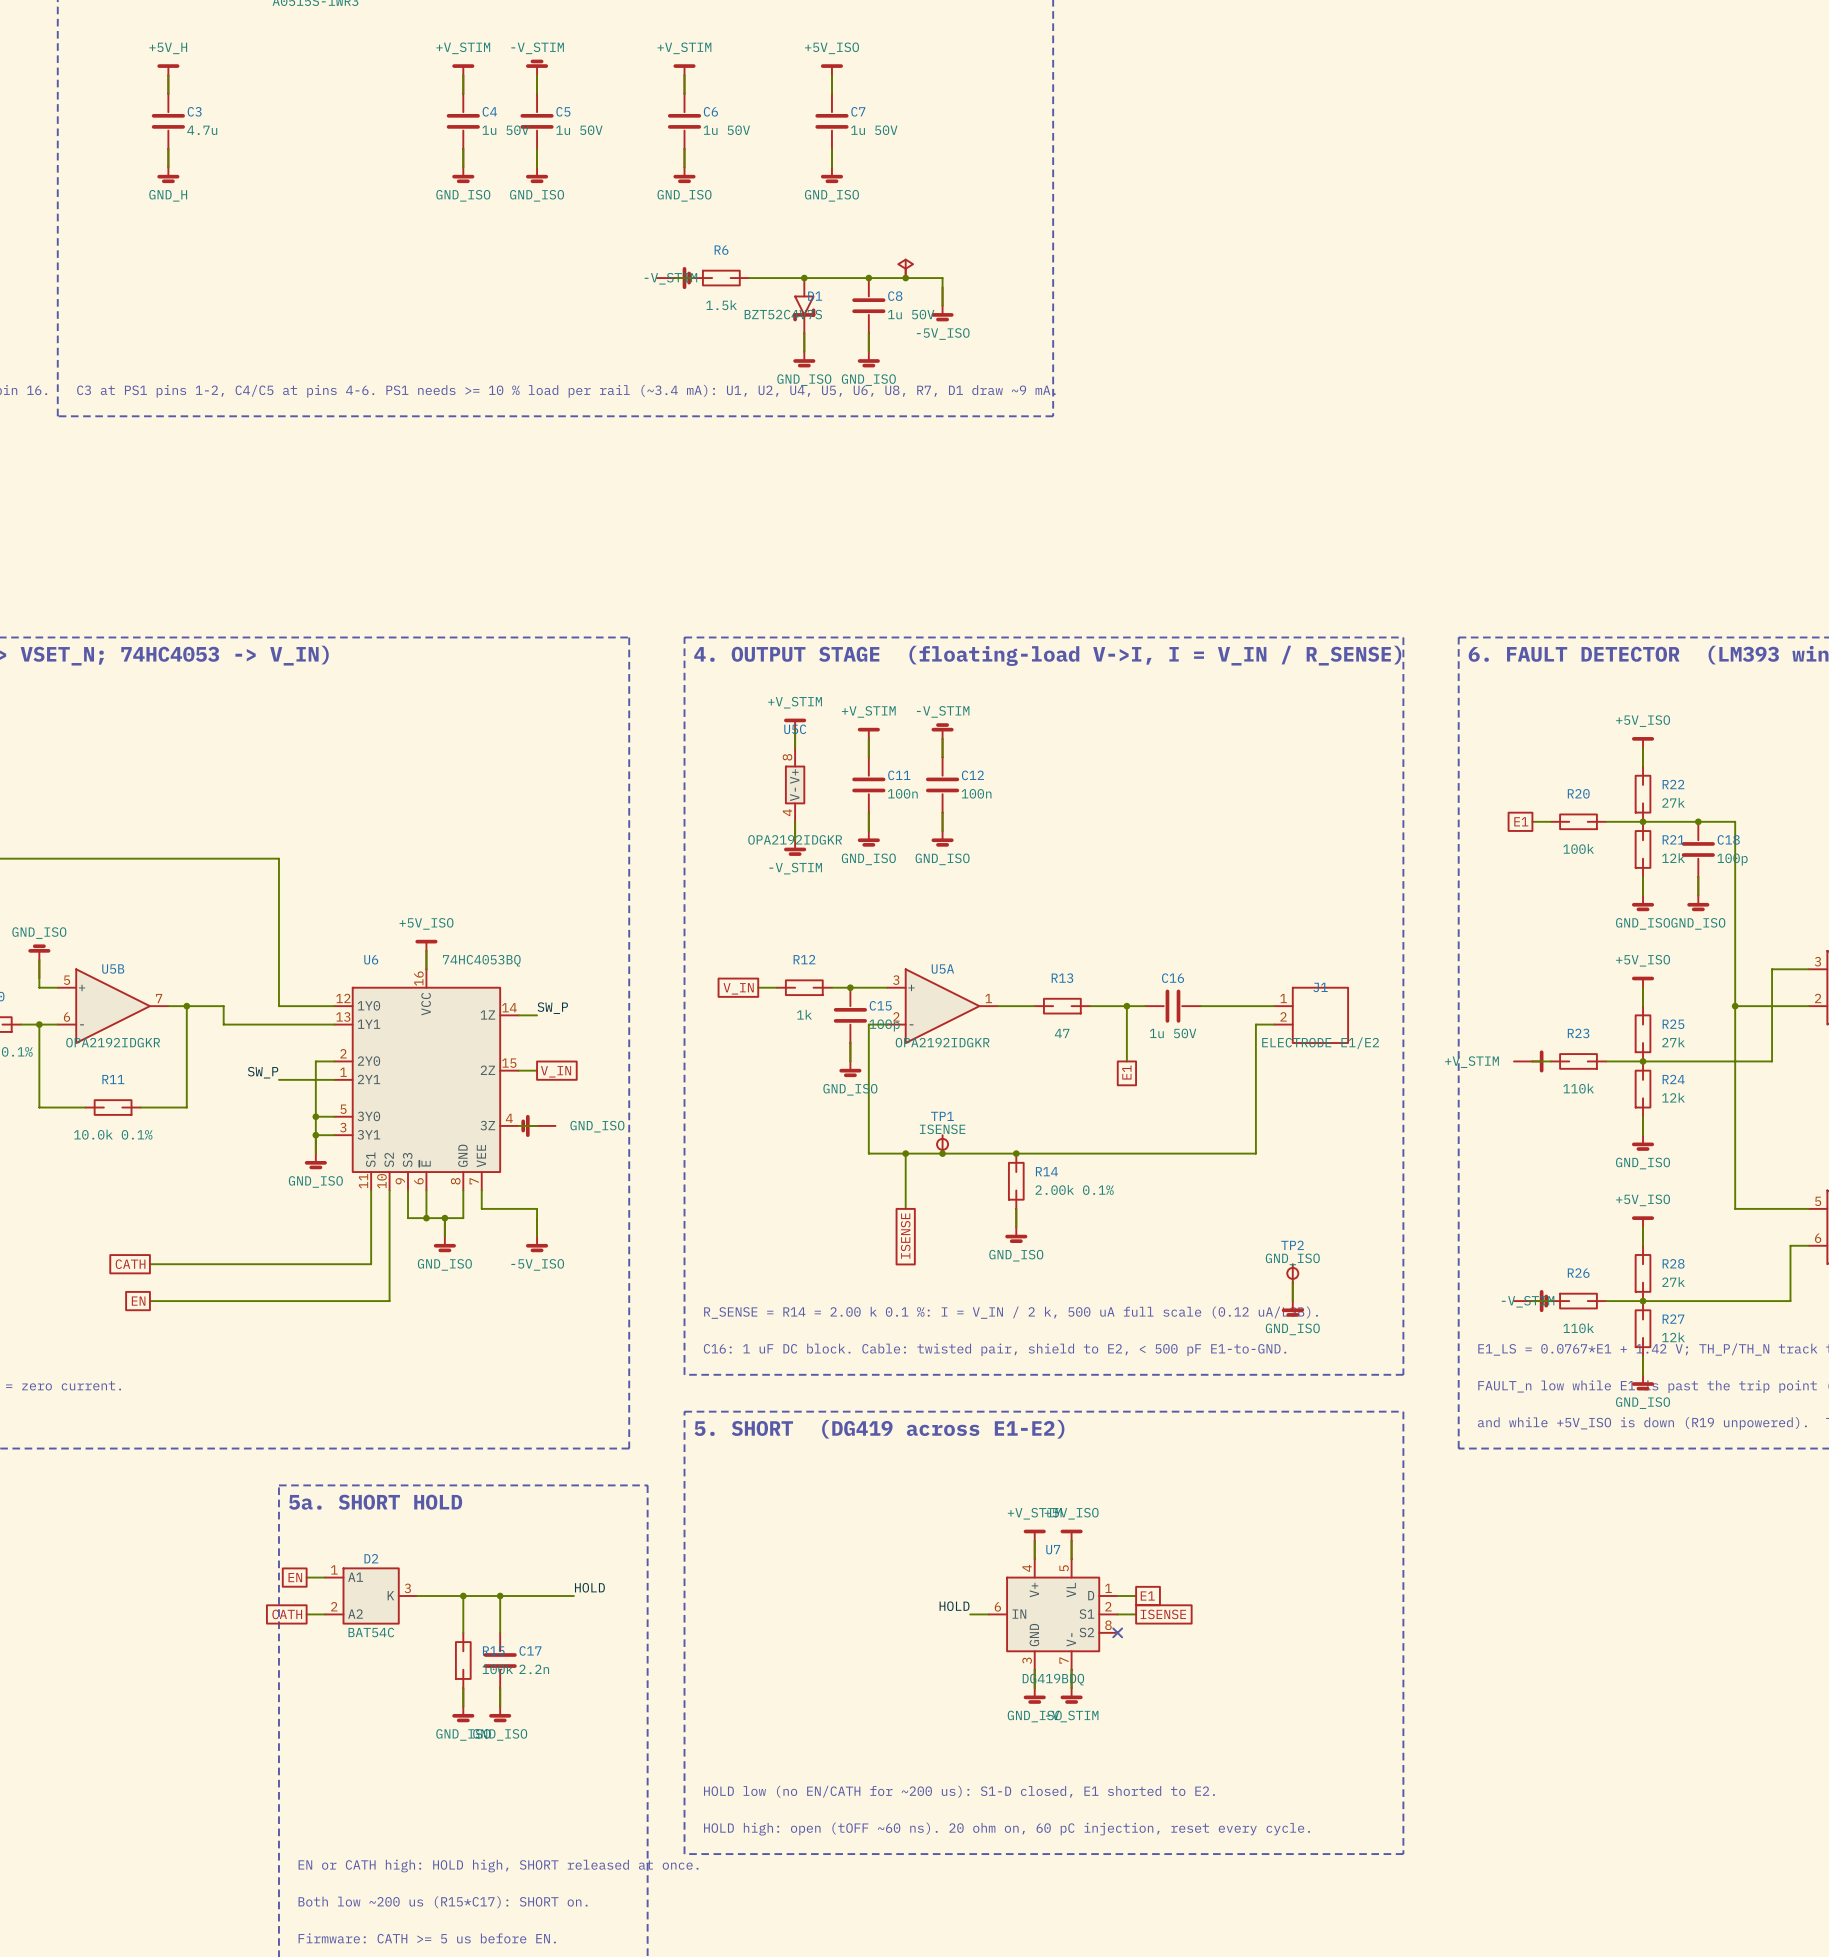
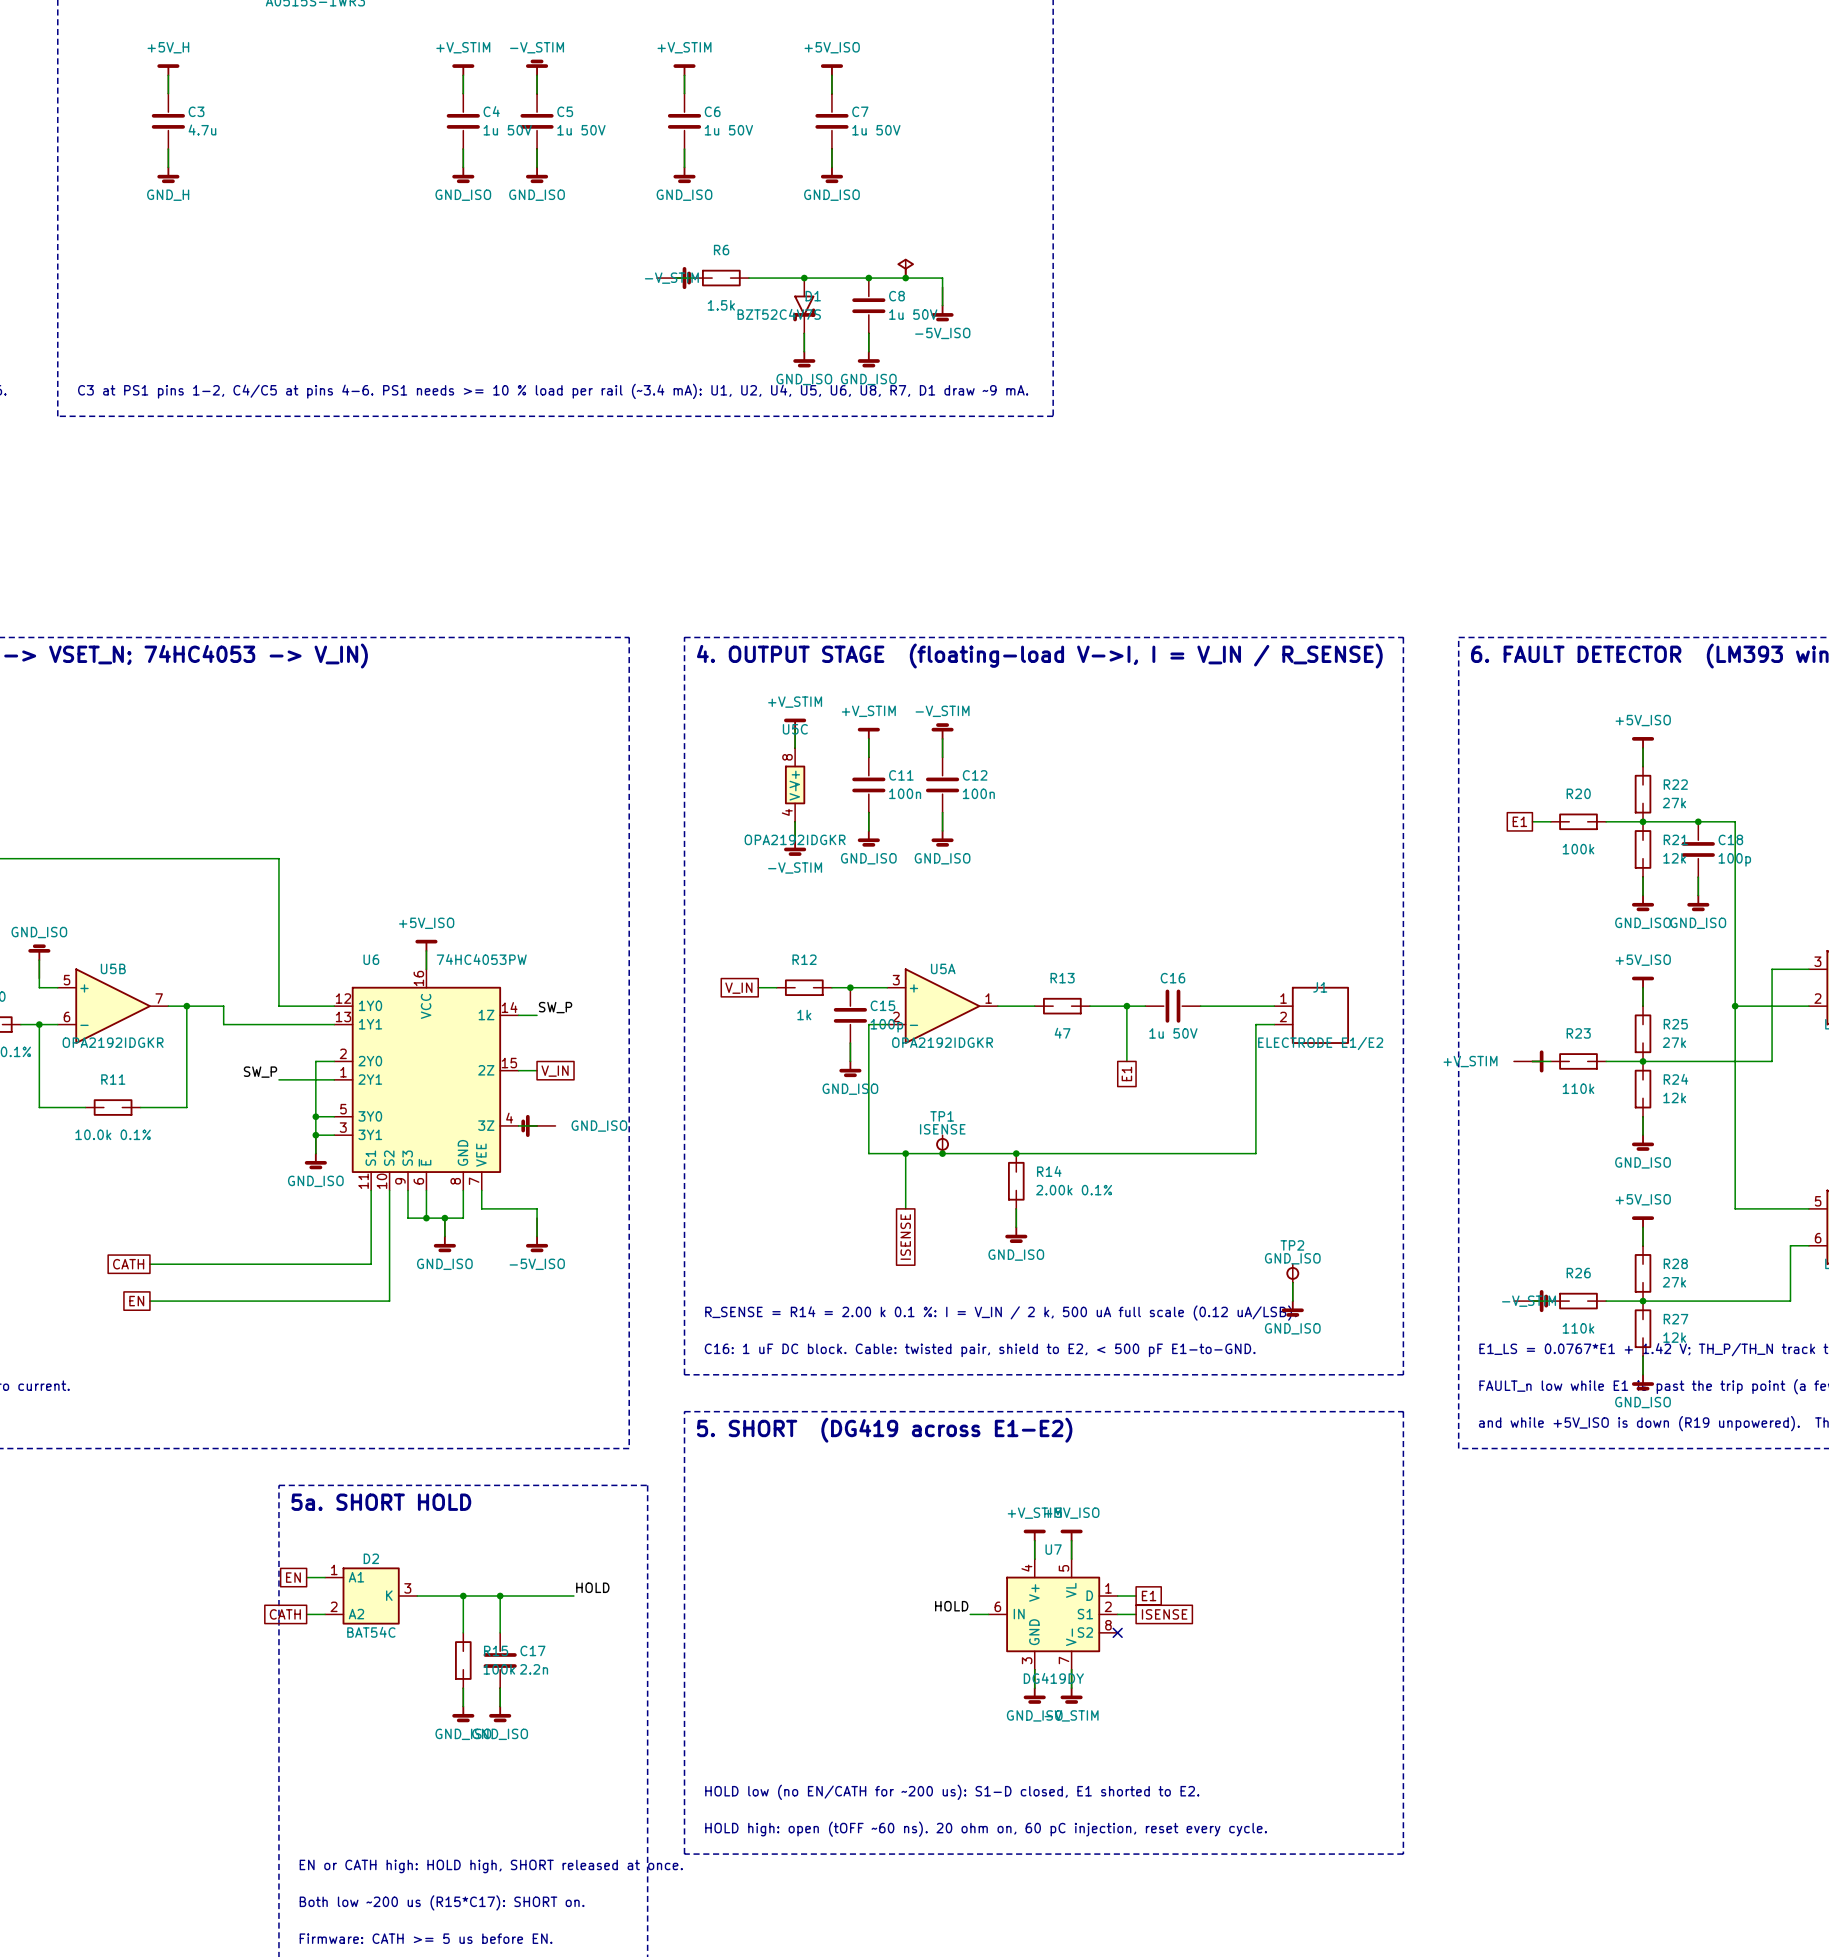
U6 value: 74HC4053BQ (481, 960) -> 74HC4053PW (481, 959)
U7 value: DG419BDQ (1053, 1679) -> DG419DY (1053, 1678)

